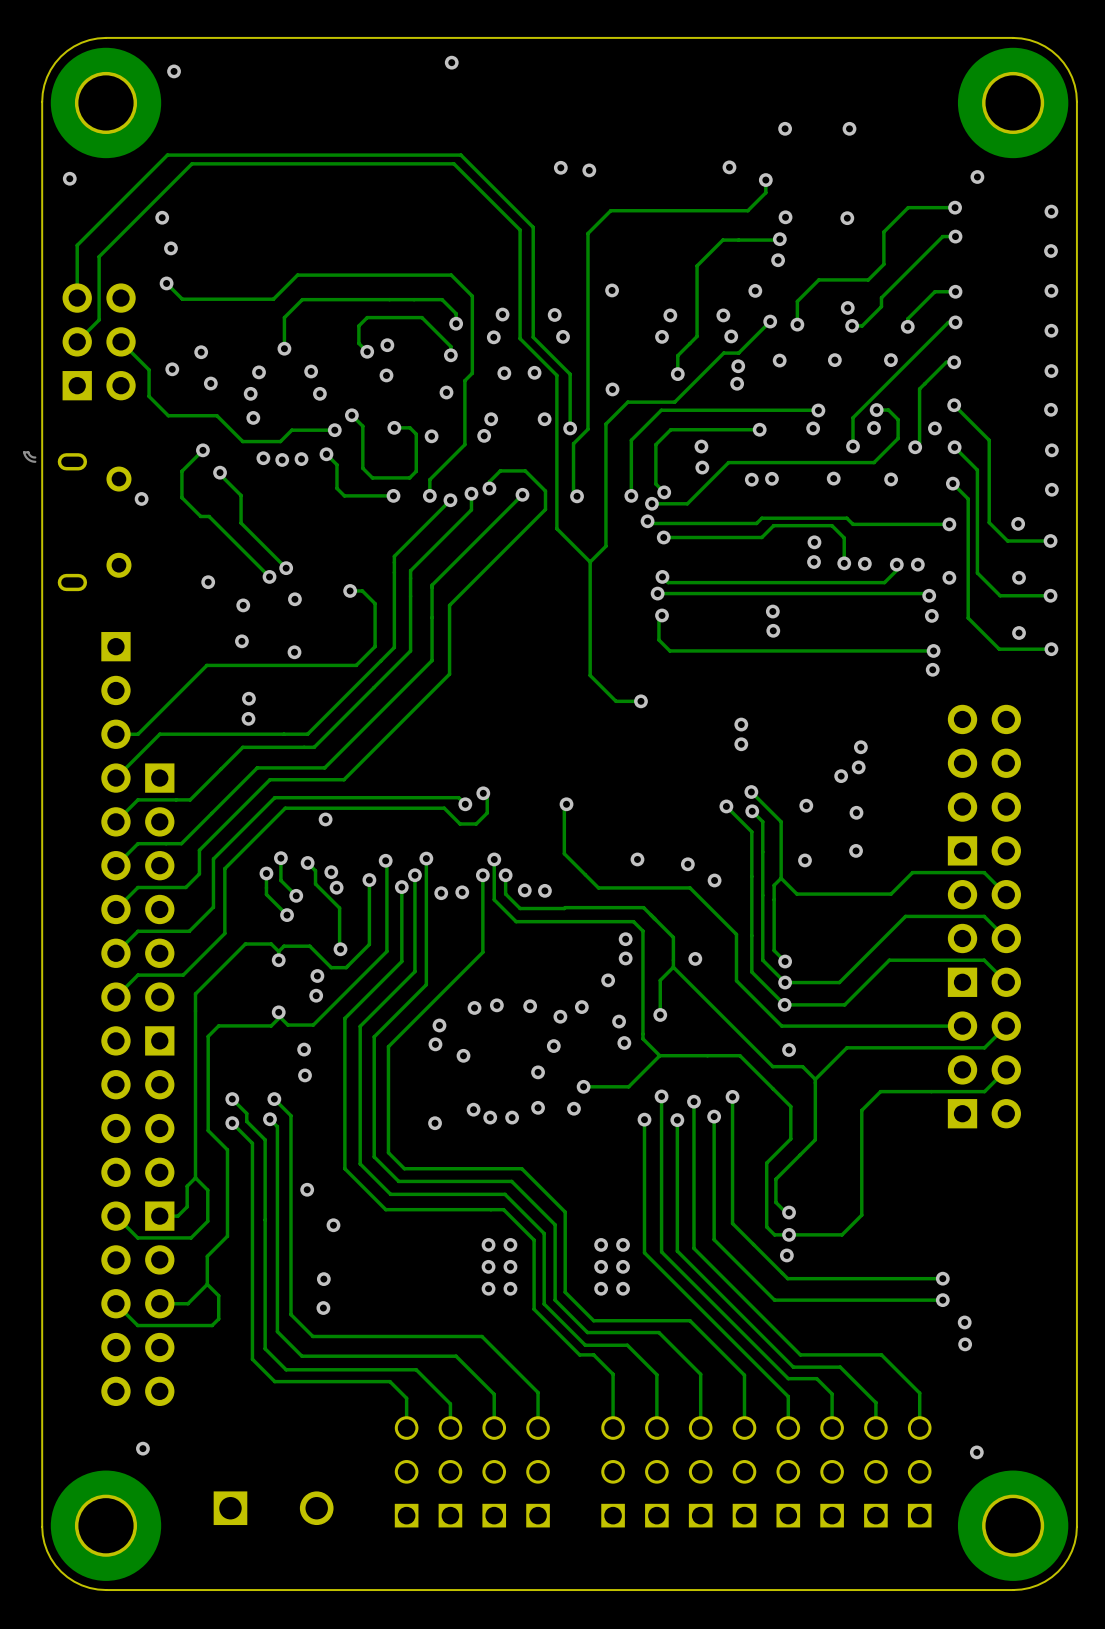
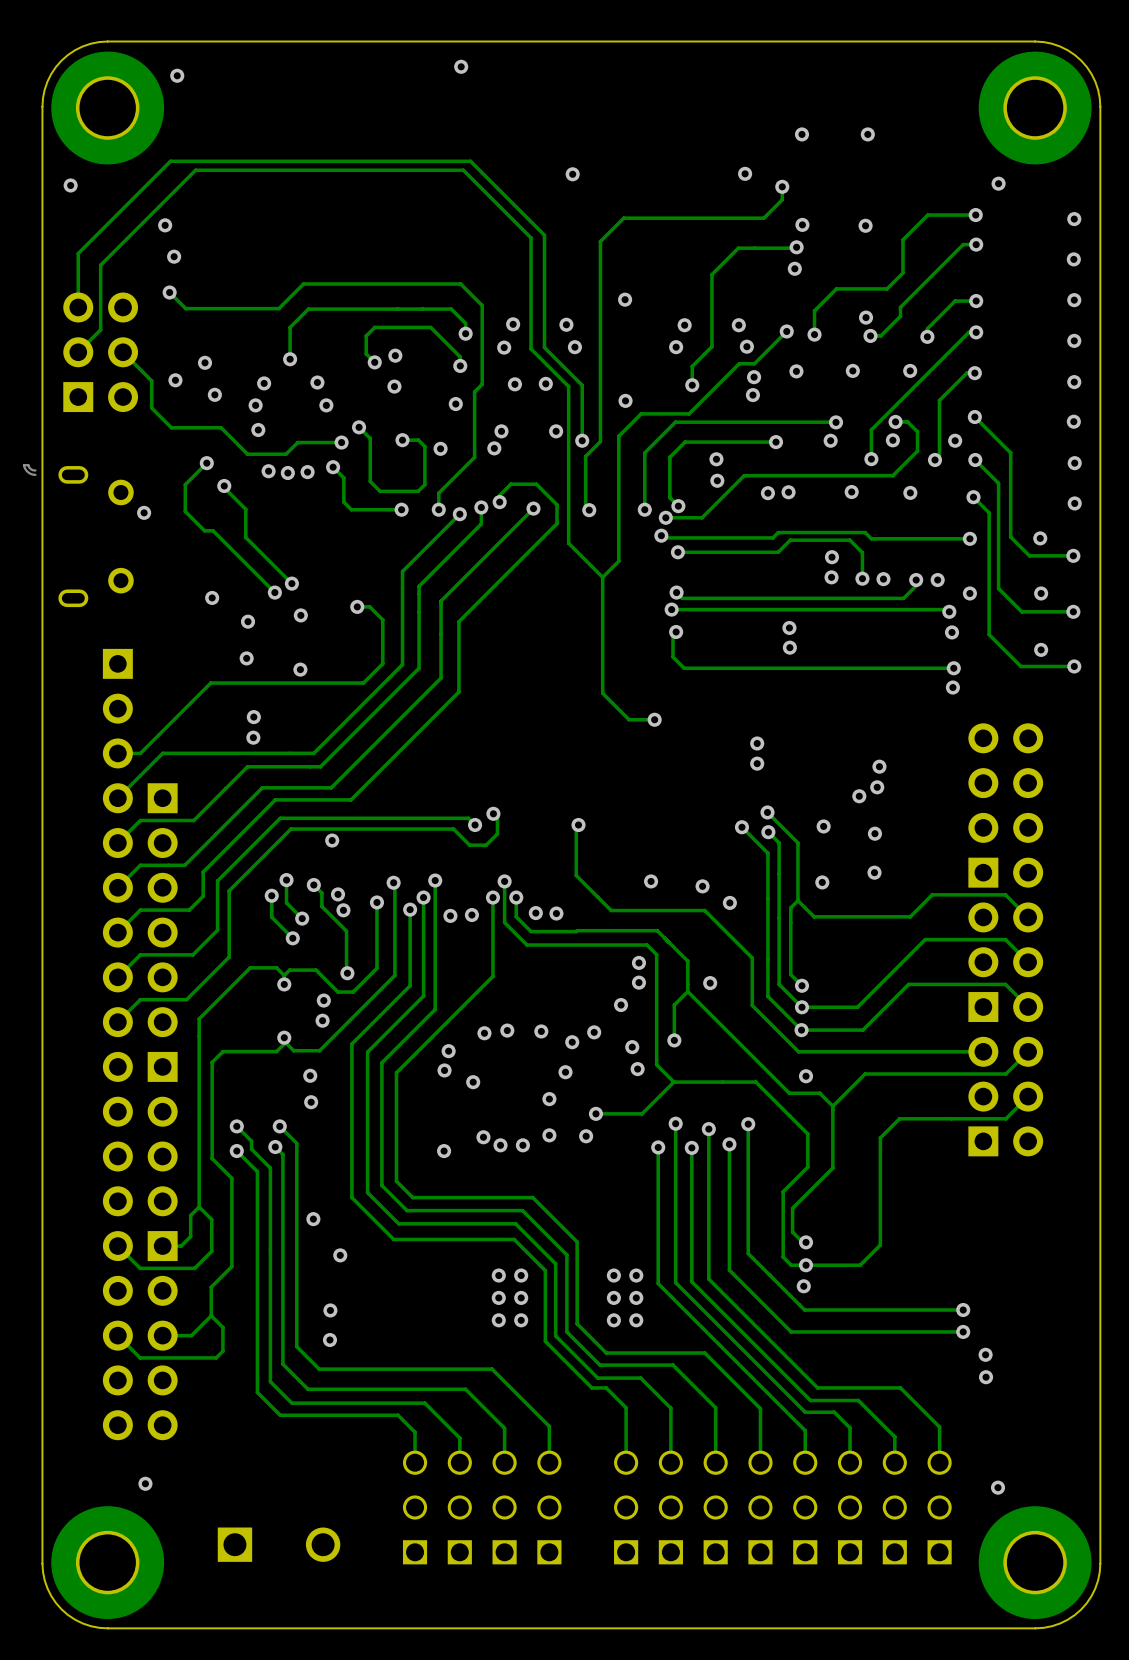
via: (589, 170) -> none
via: (755, 290) -> none

